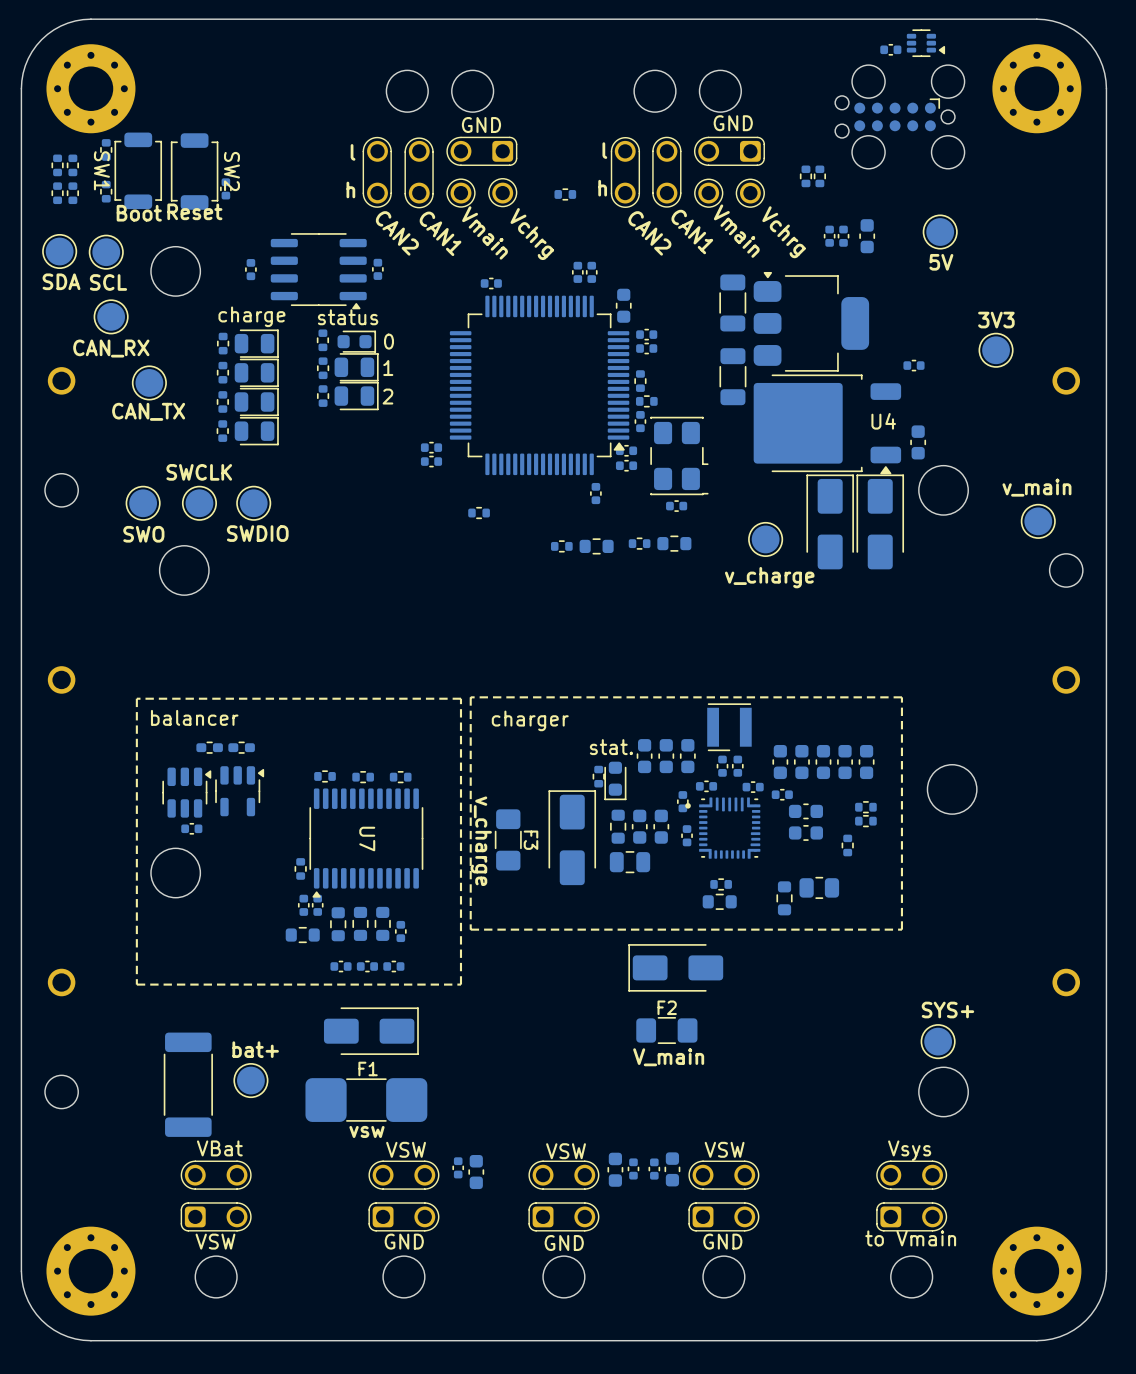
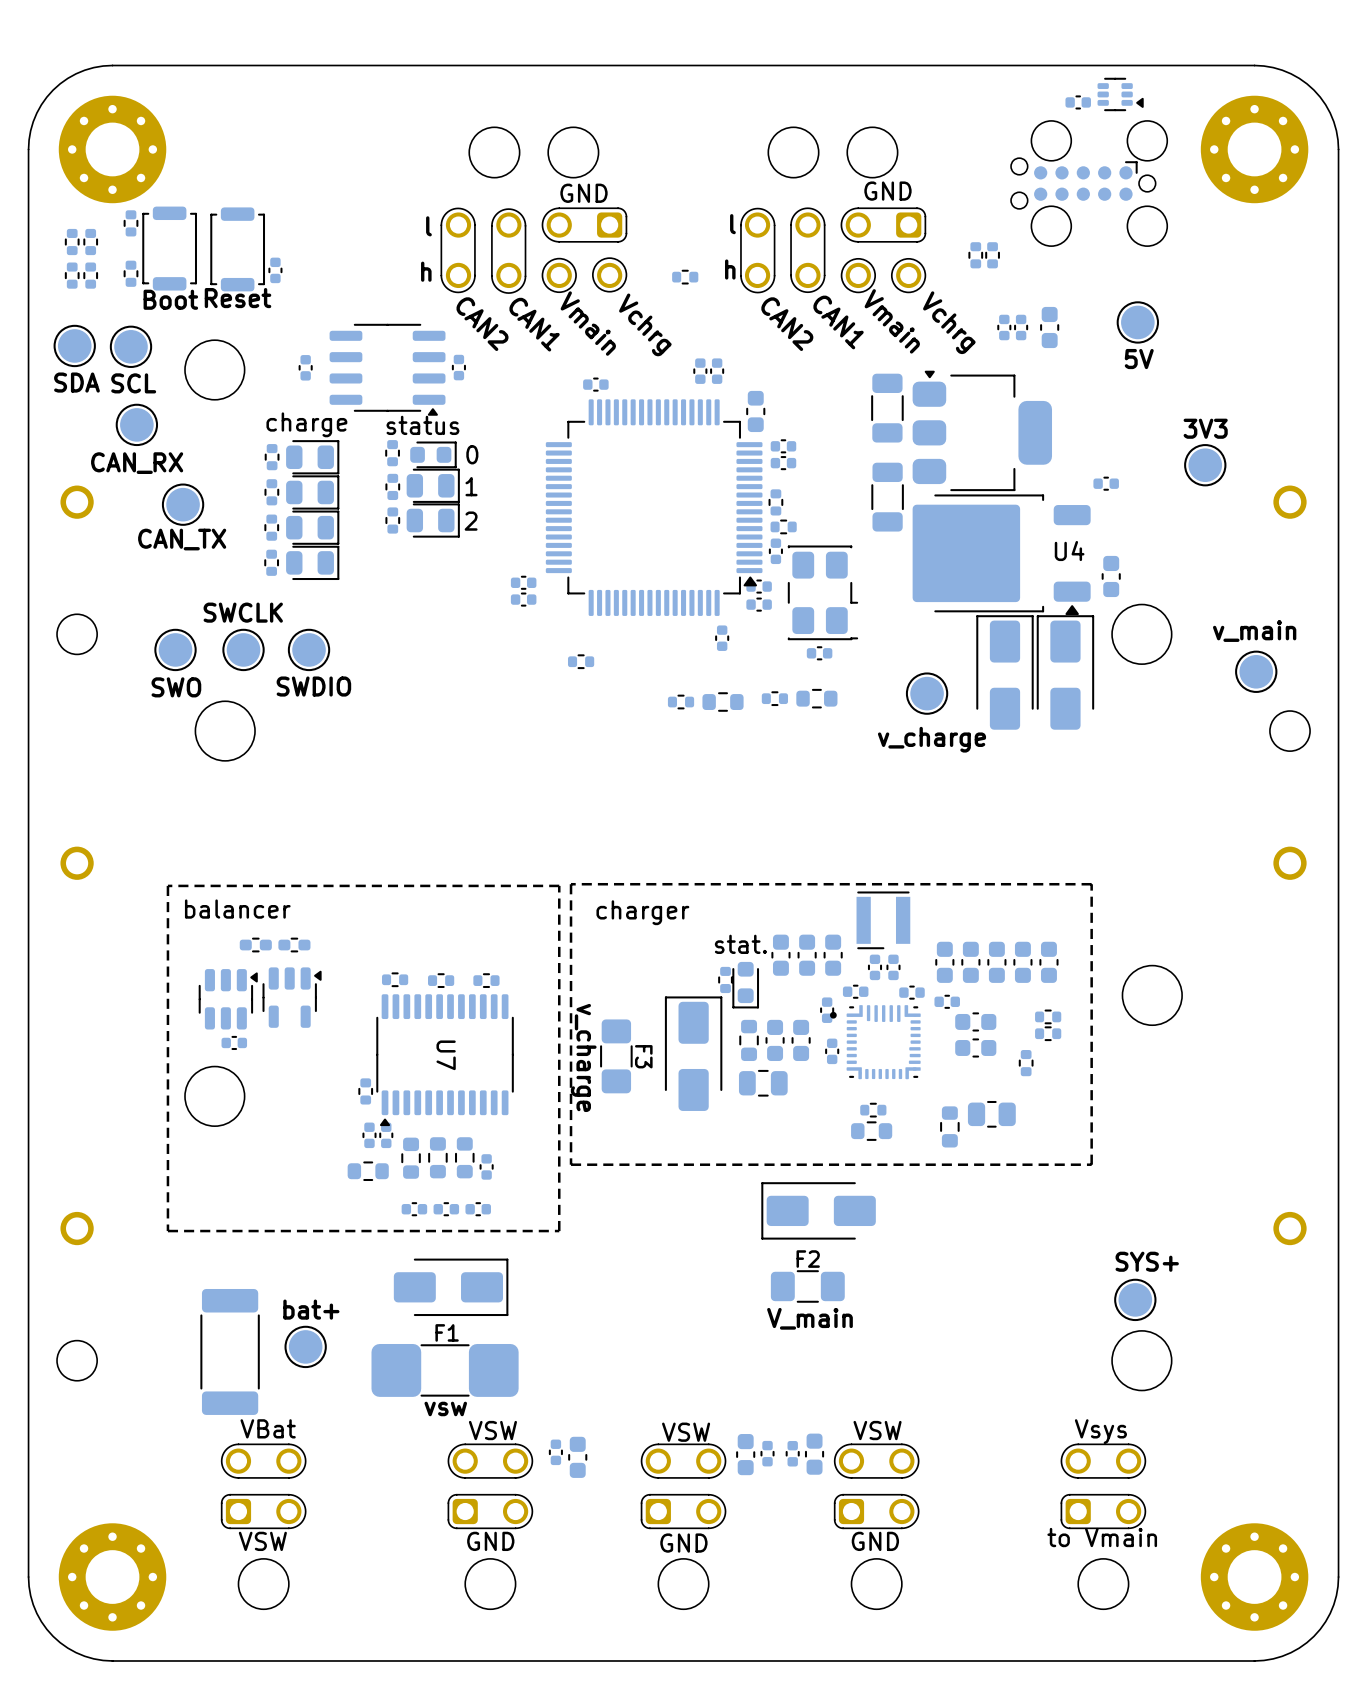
SW1: (138, 170) -> none
part: none -> (169, 248)
SW2: (194, 171) -> none
part: none -> (237, 249)

